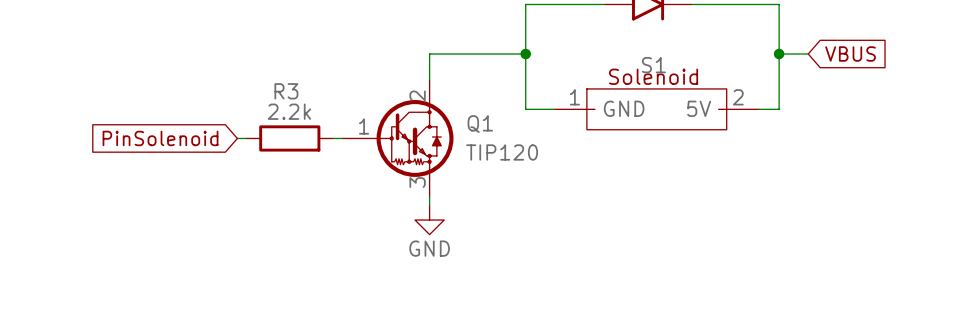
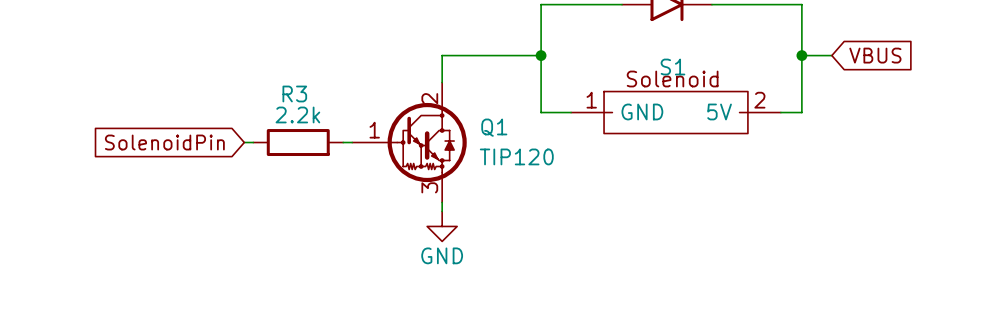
global label: PinSolenoid (160, 138) -> SolenoidPin (164, 142)

